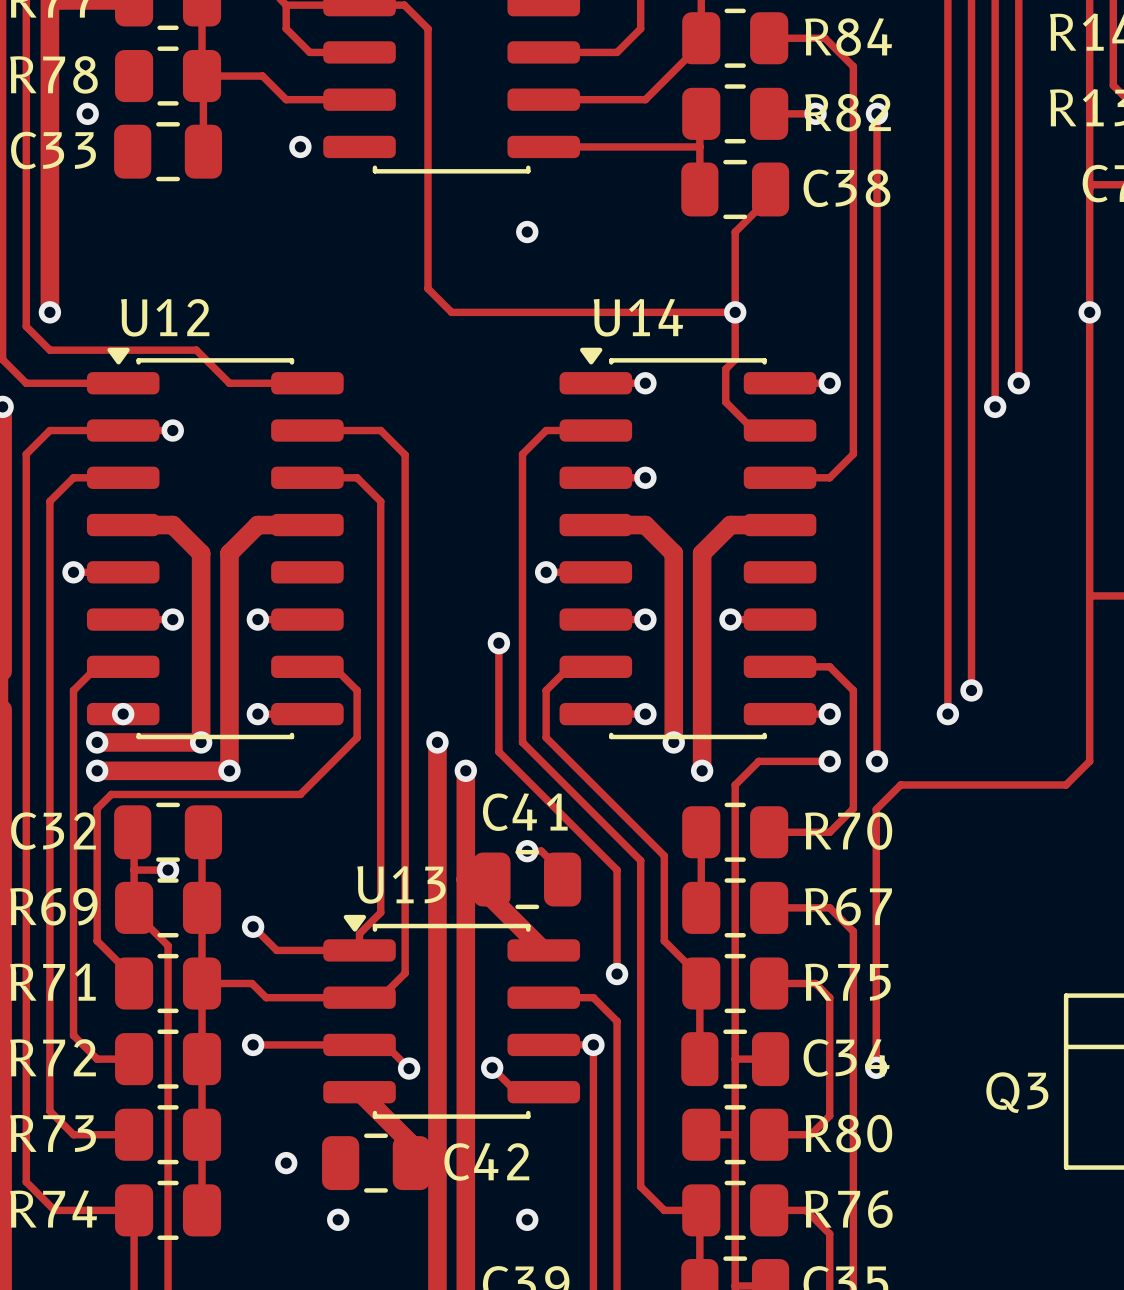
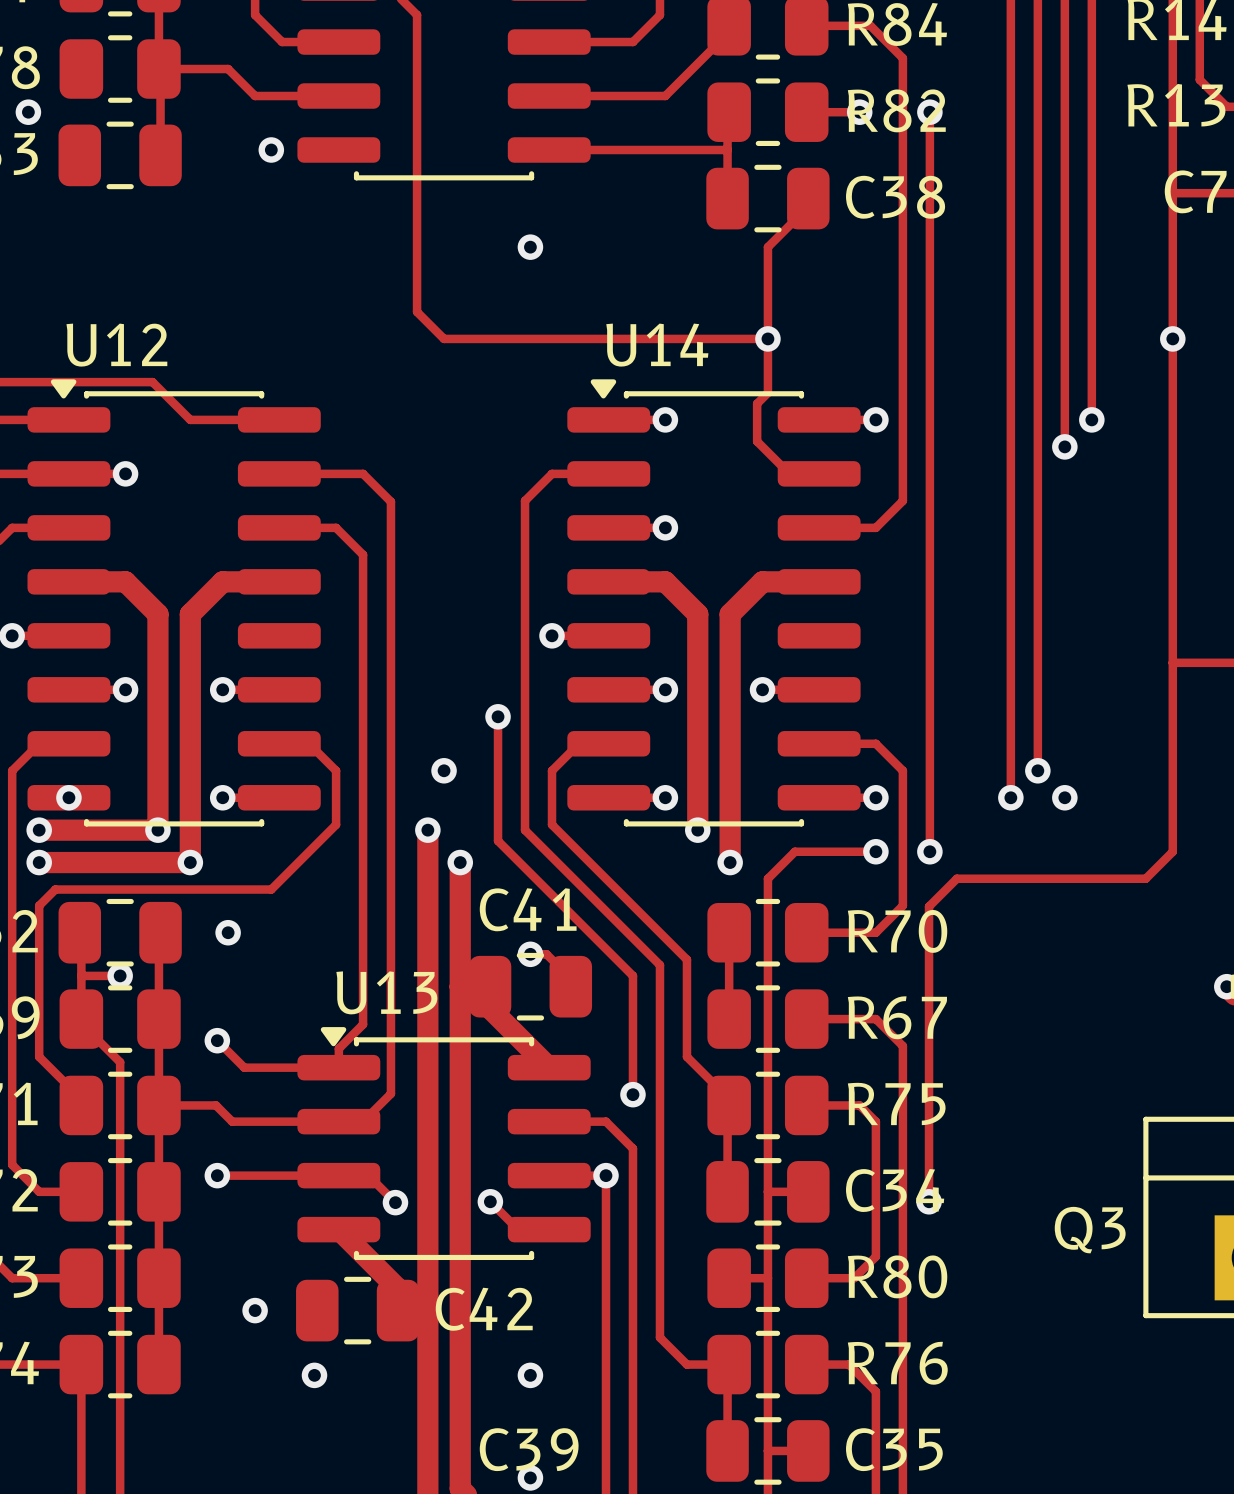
via: none -> (444, 770)
via: none -> (1064, 797)
via: none -> (228, 932)

